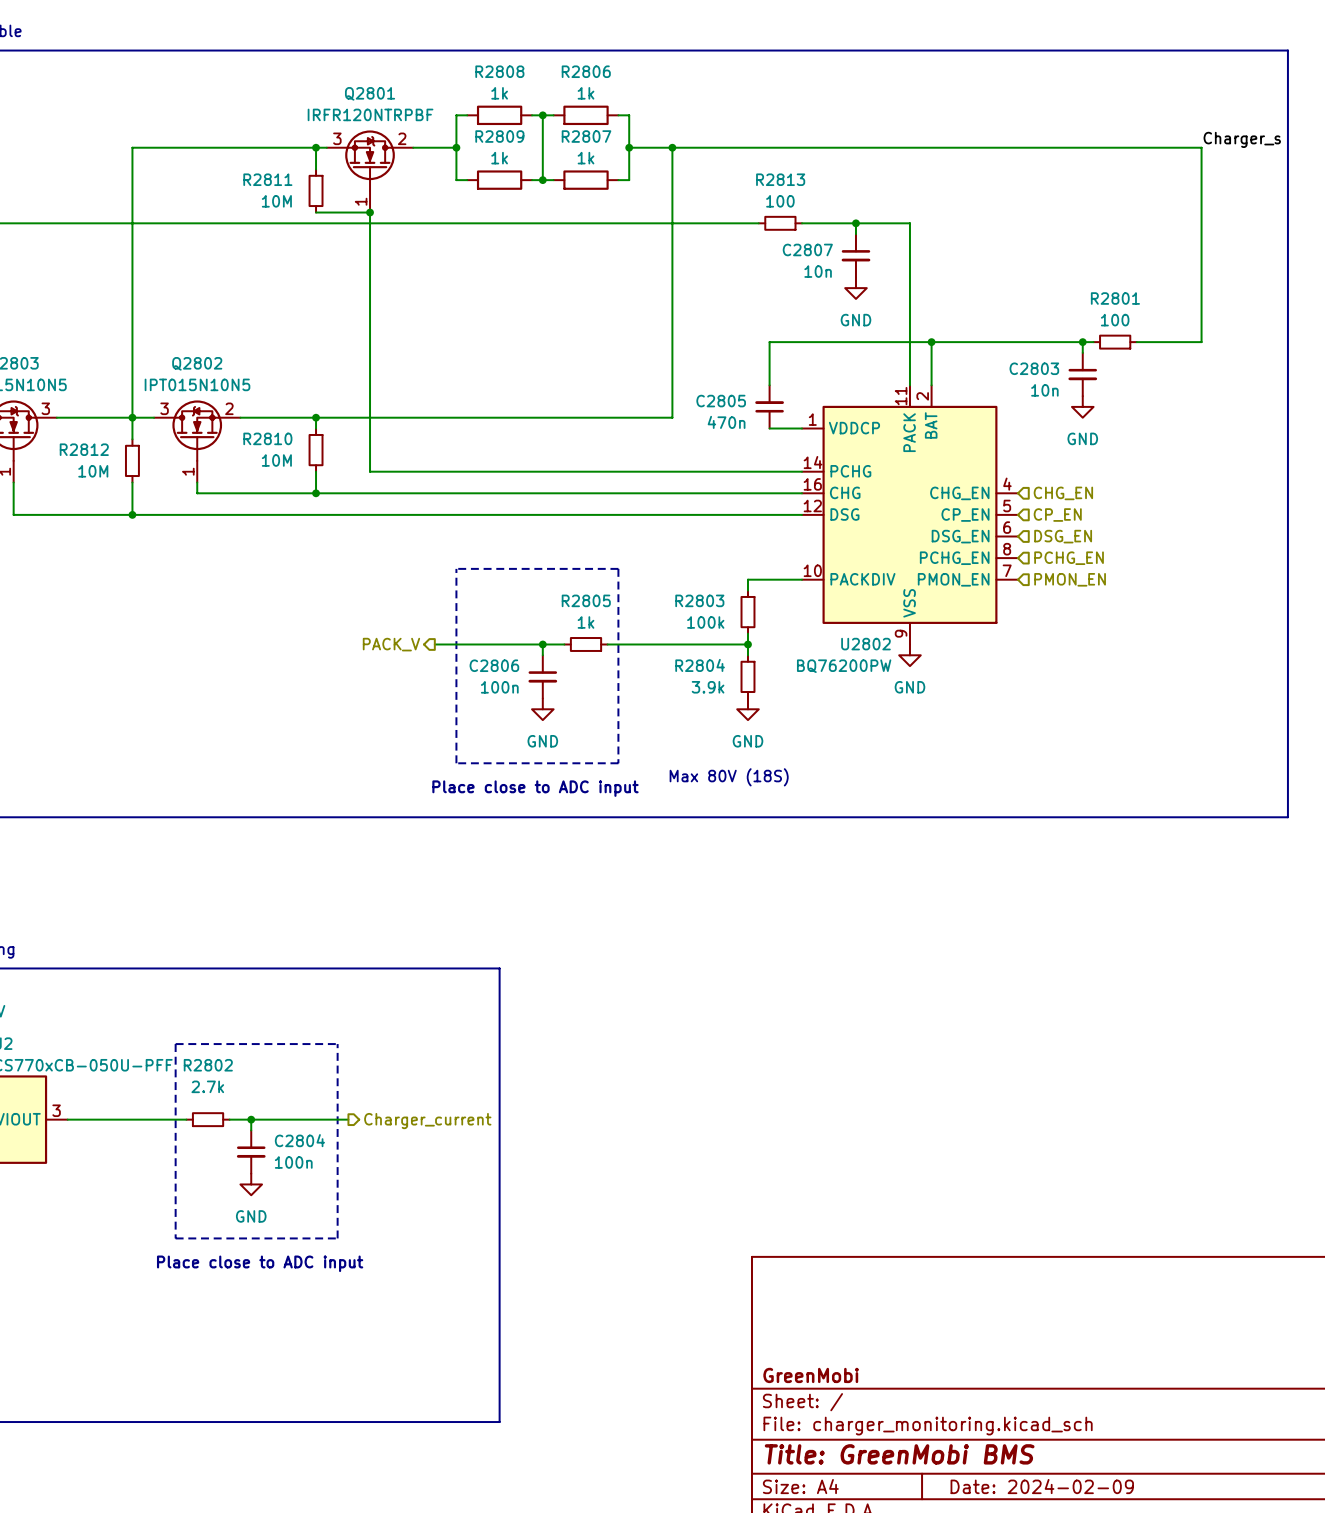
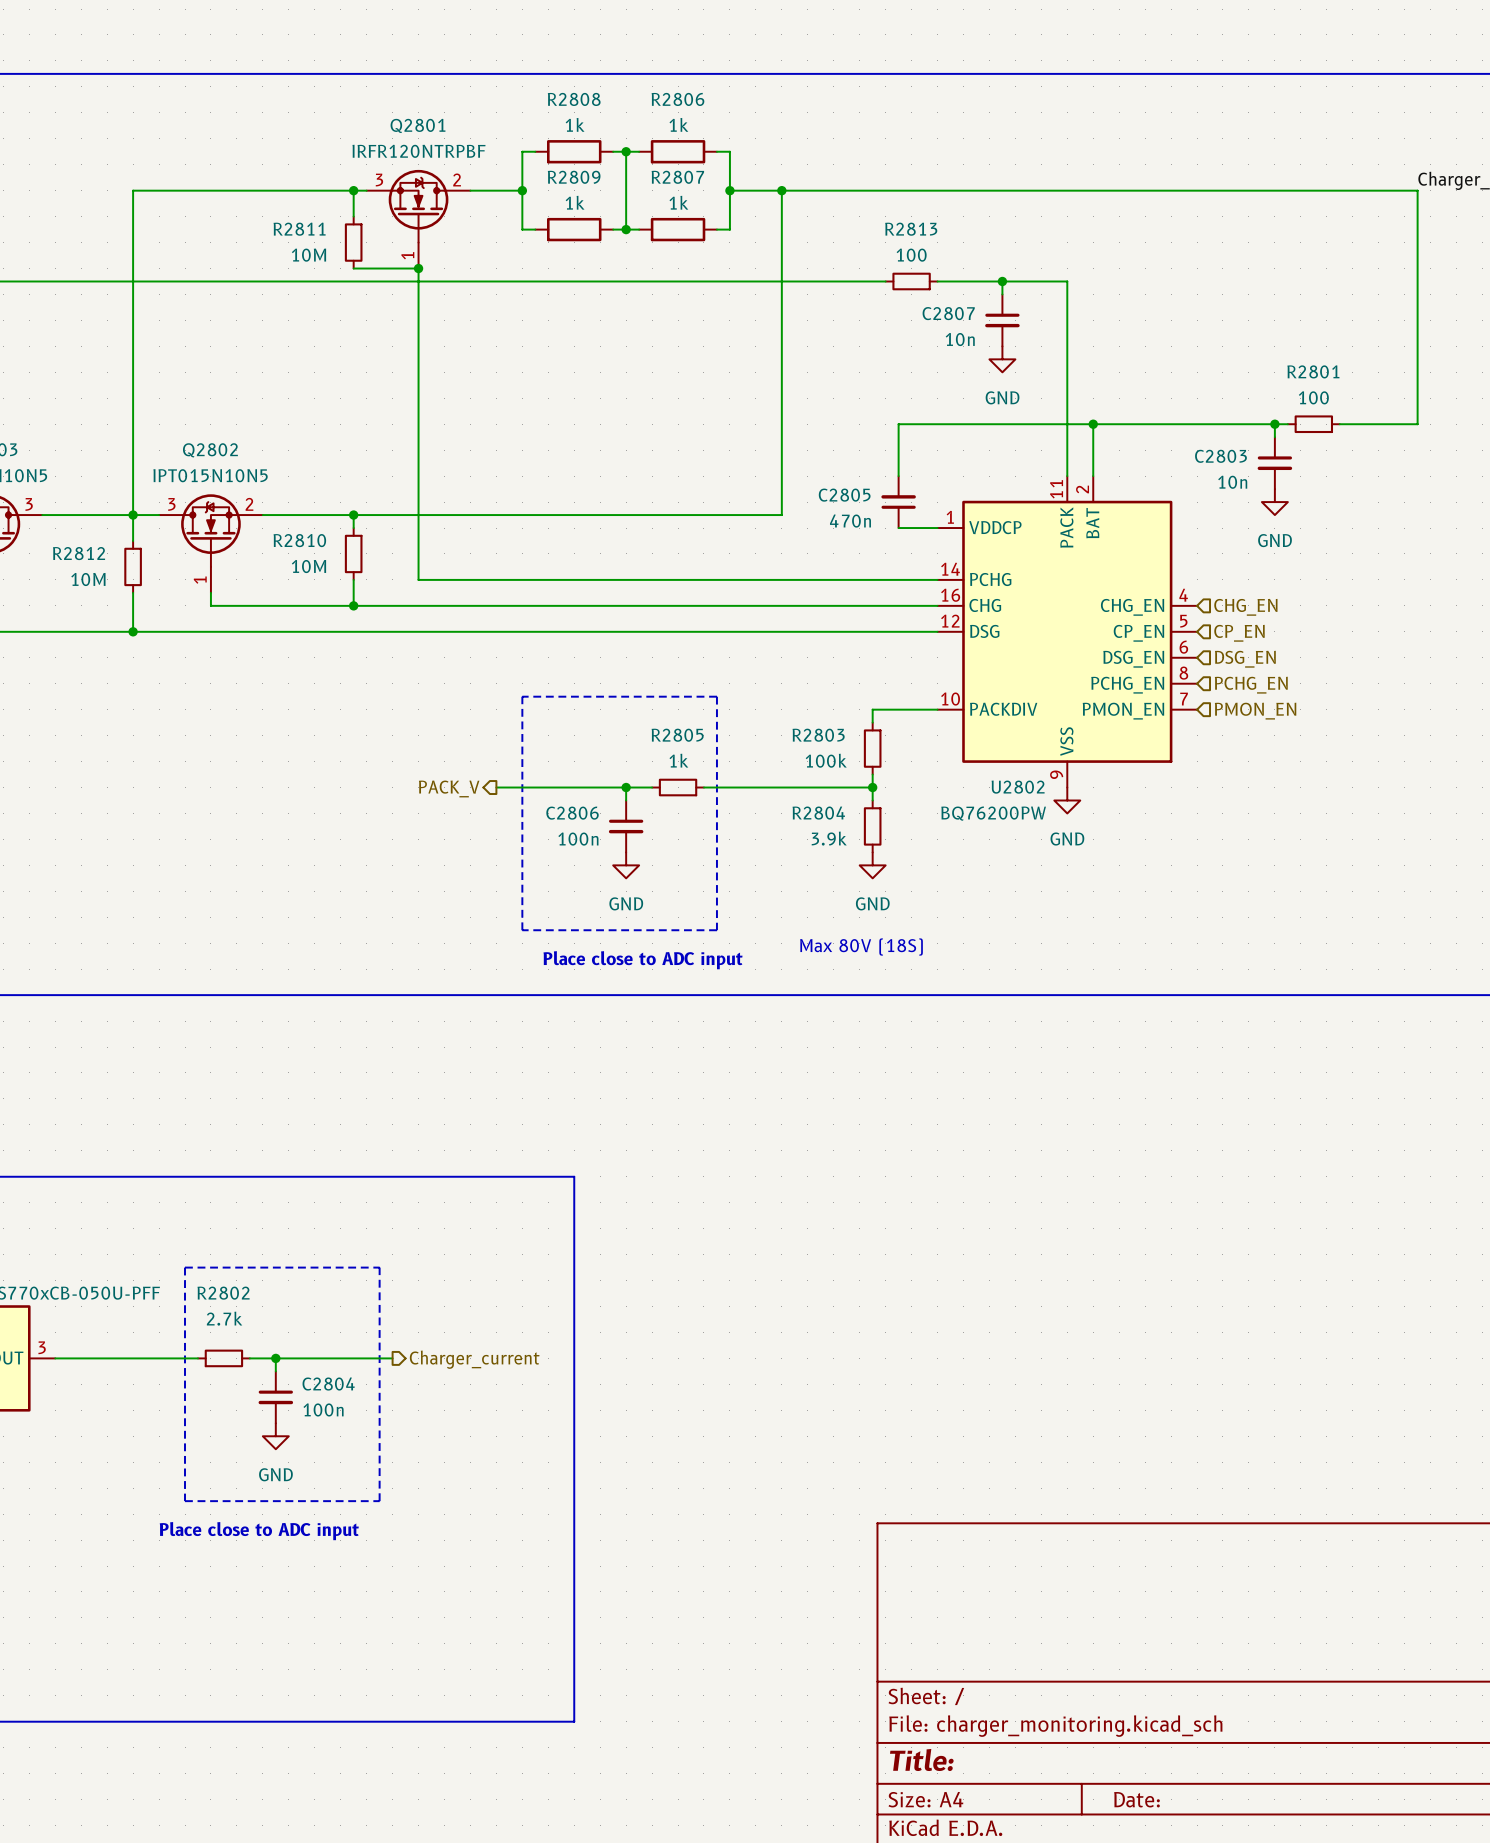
title block: GreenMobi (811, 1375) -> none
title block: Title: GreenMobi BMS (899, 1454) -> Title: (921, 1760)
title block: Date: 2024-02-09 (1042, 1486) -> Date: (1136, 1799)

